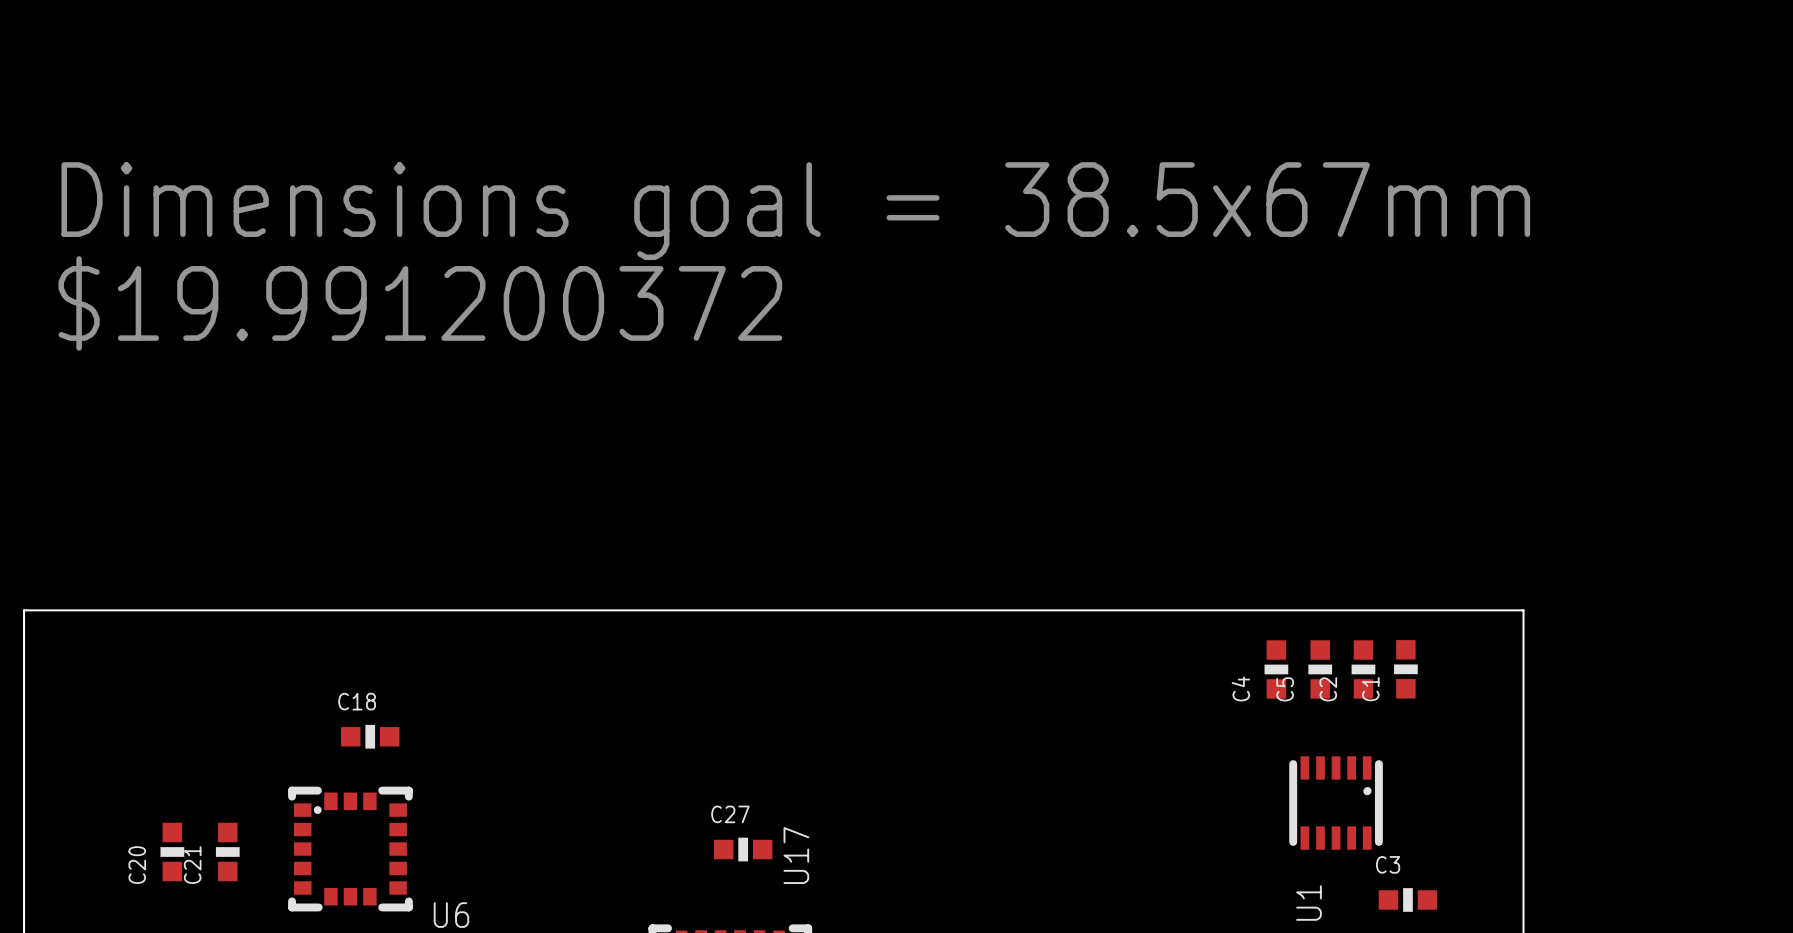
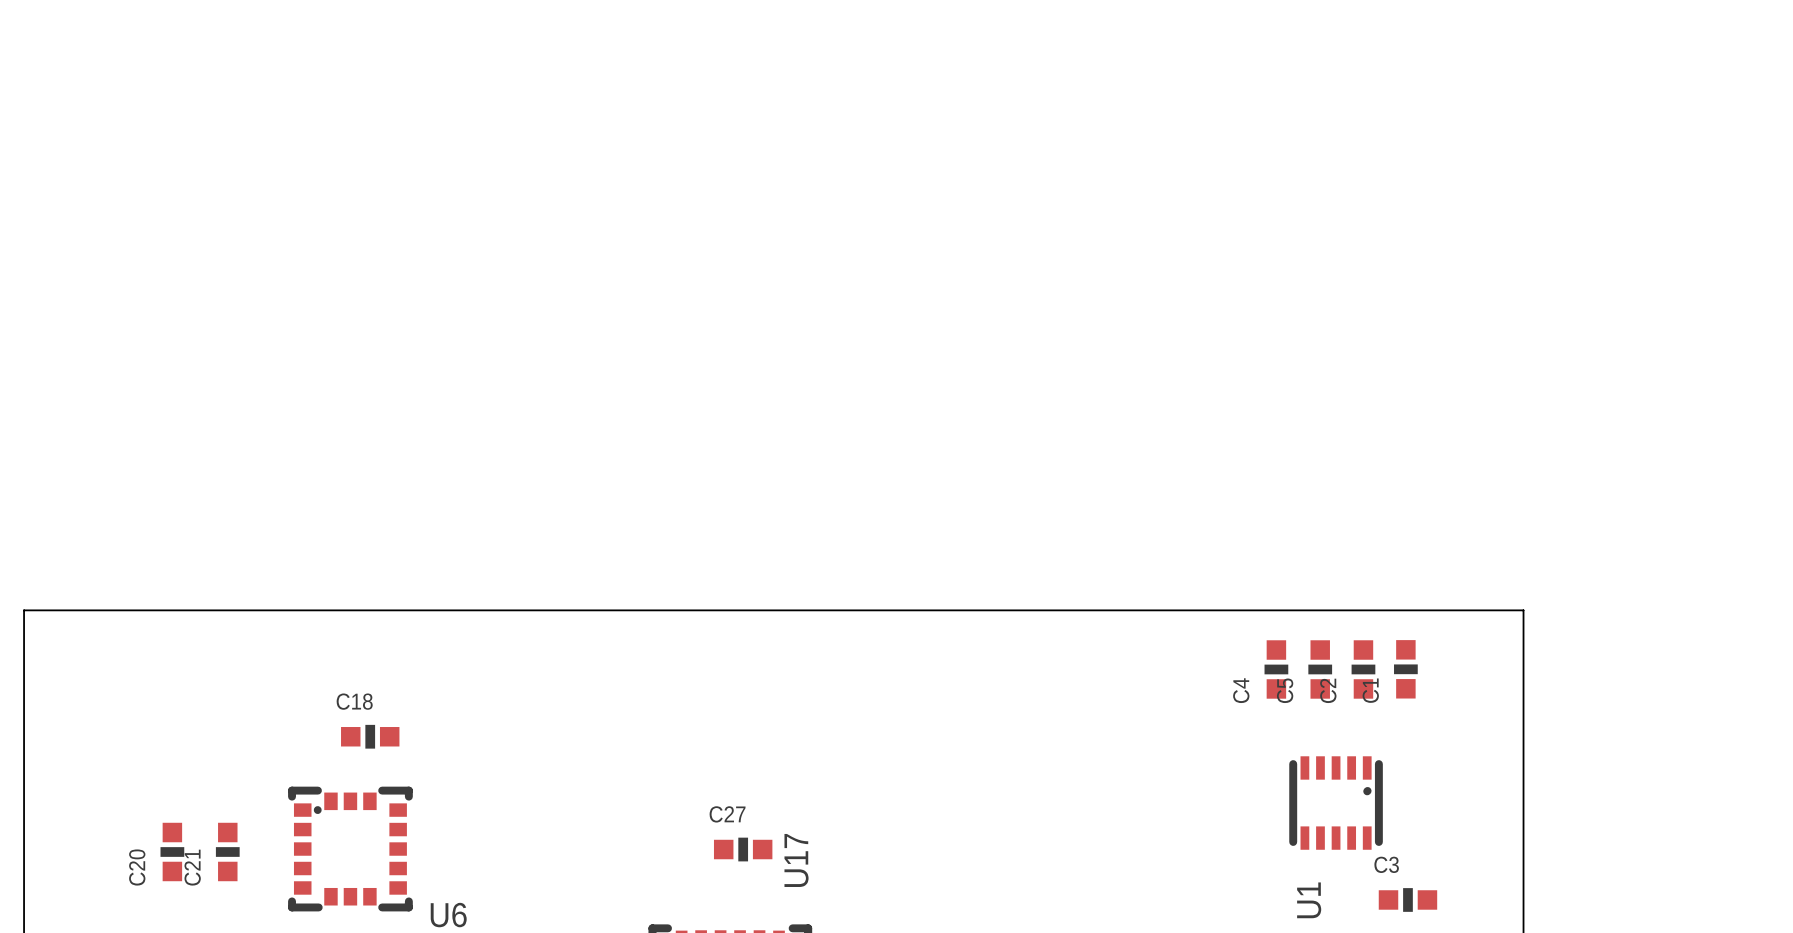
text: Dimensions goal = 38.5x67mm (795, 211) -> none
text: $19.991200372 (420, 303) -> none

